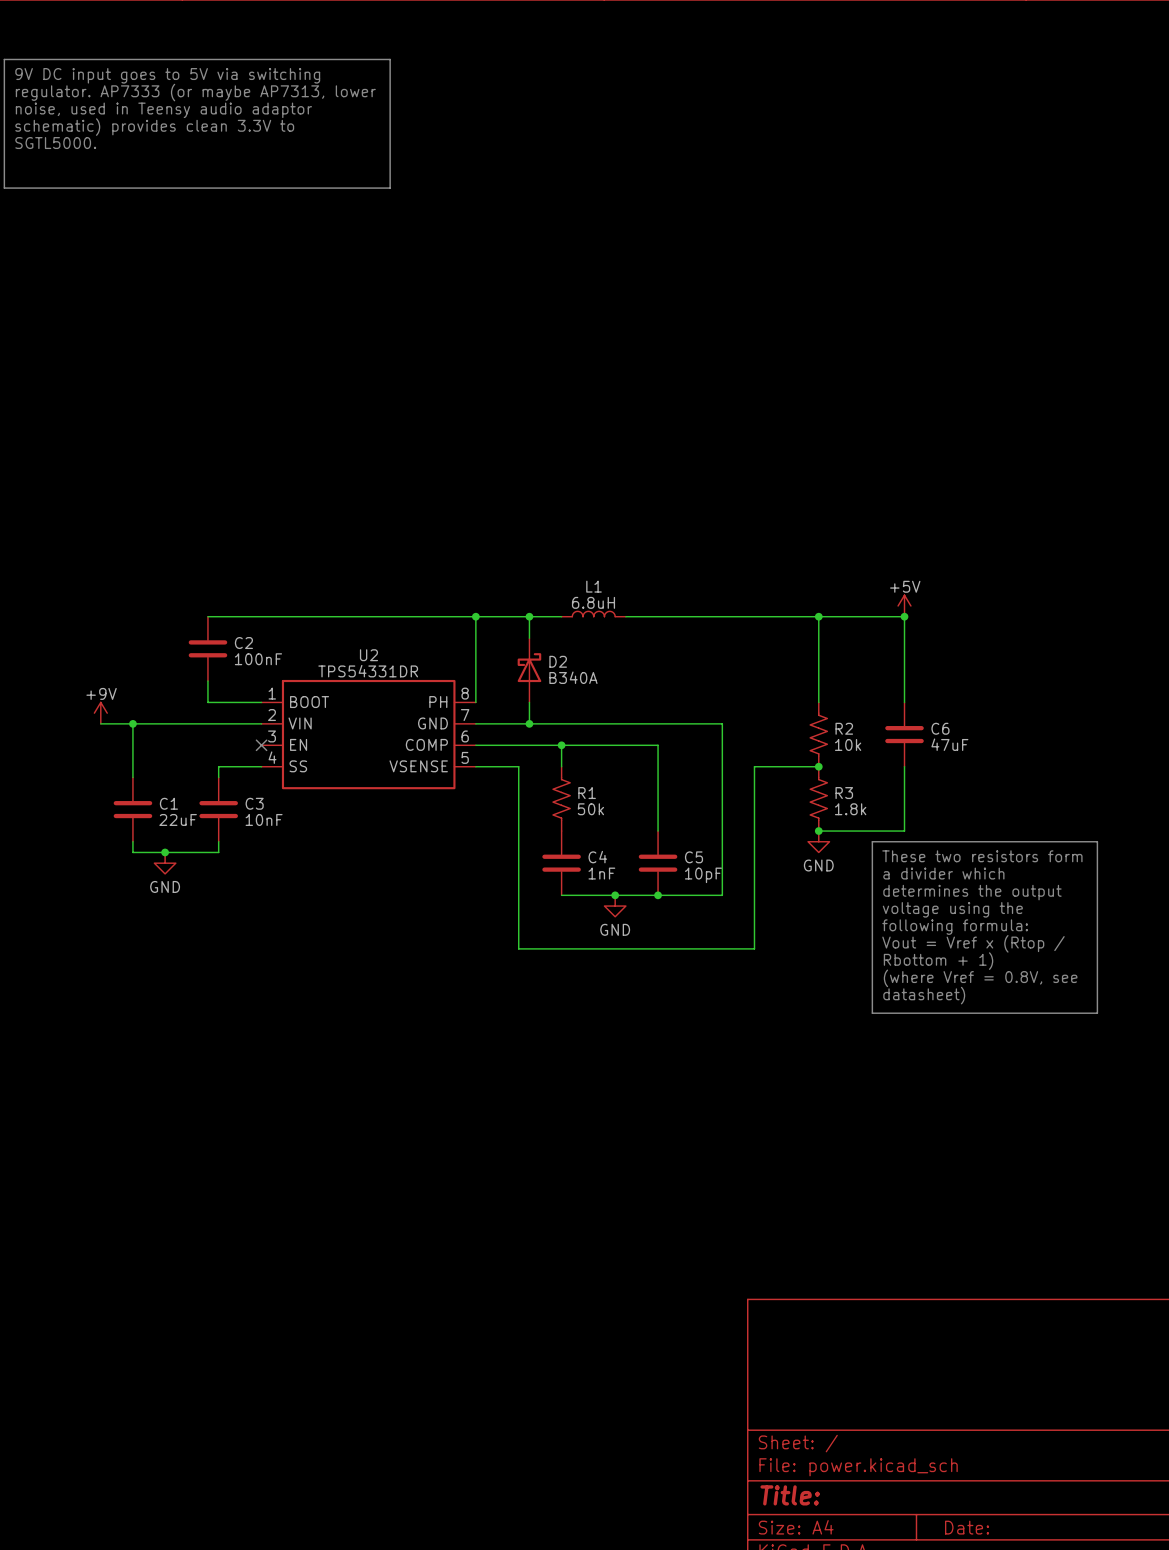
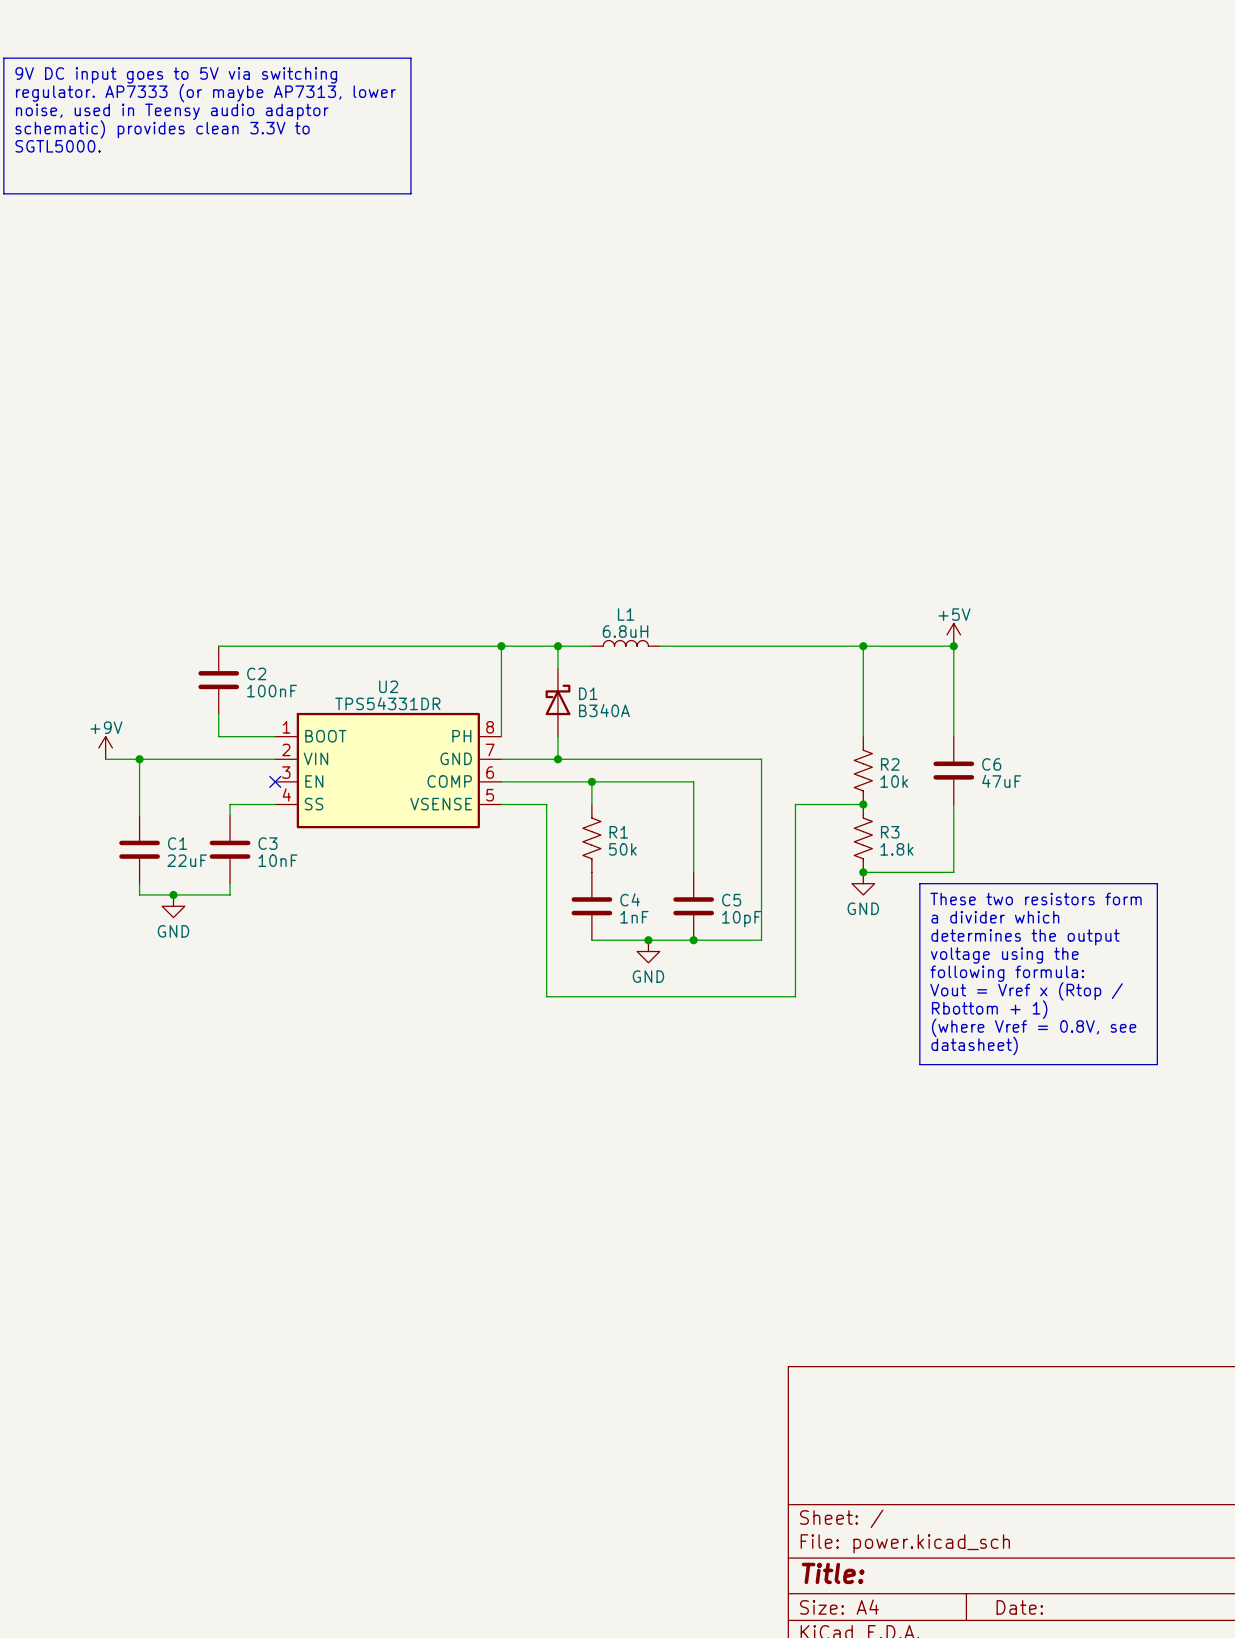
D2 name: D2 (558, 661) -> D1 (588, 693)

